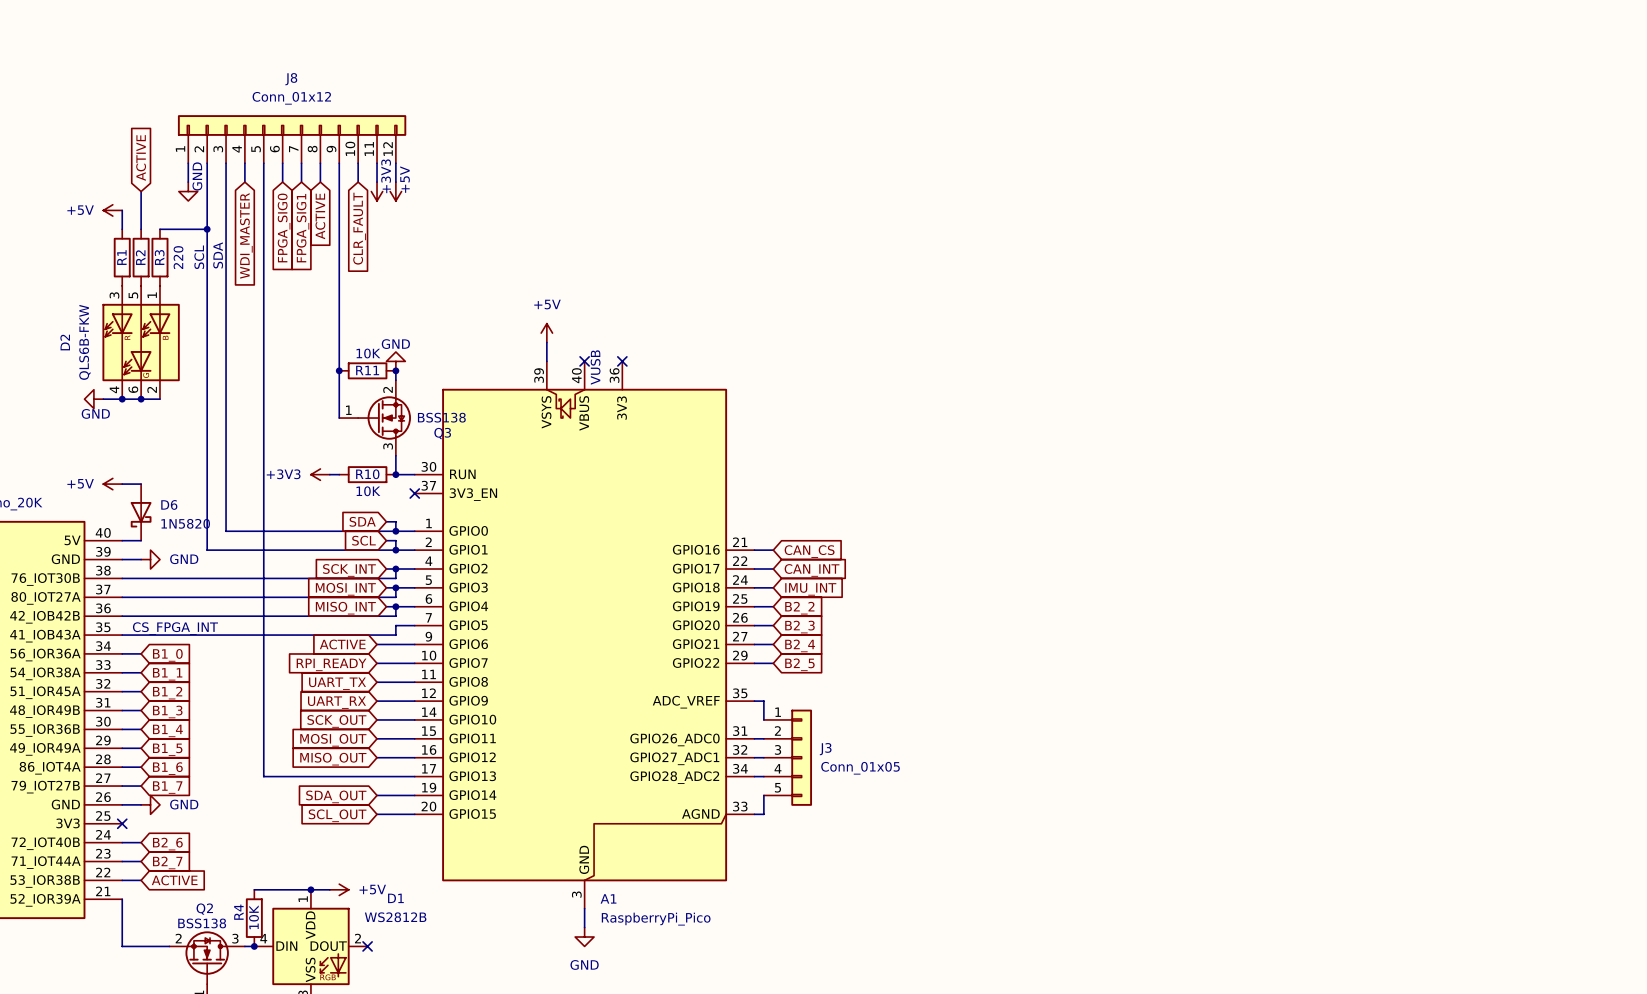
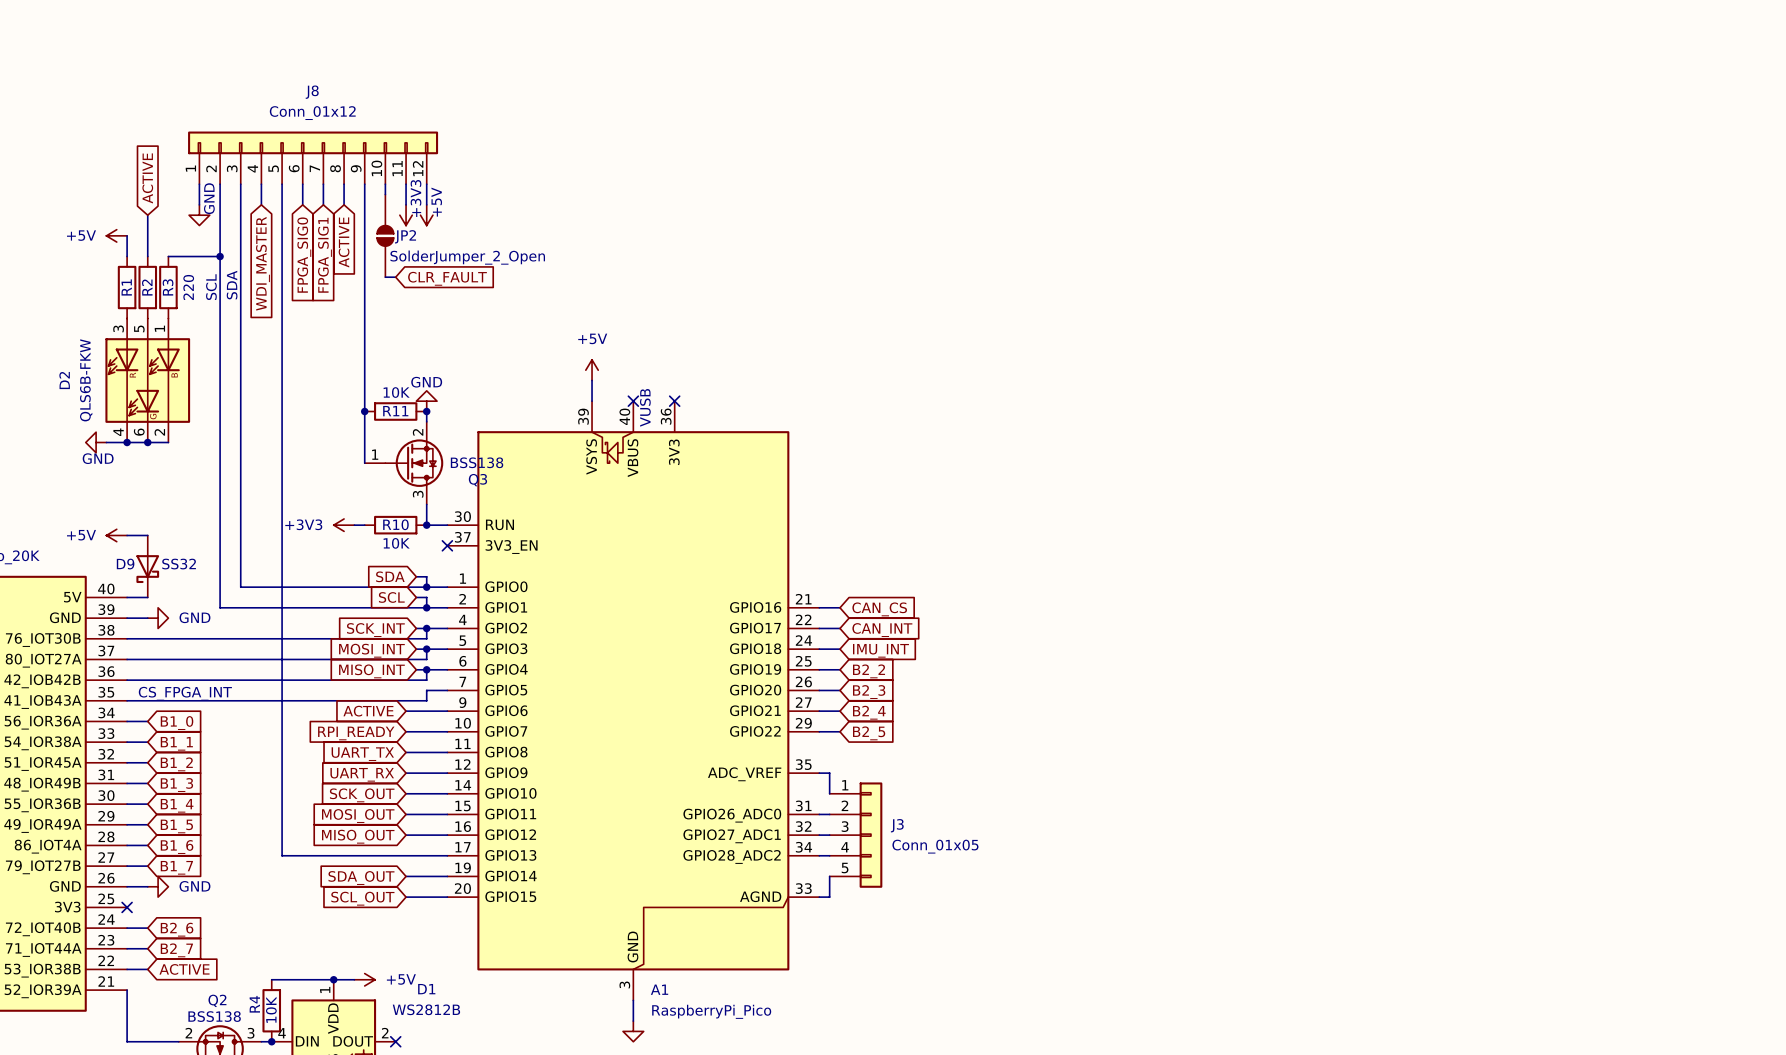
JP2: none -> SolderJumper_2_Open (385, 235)
global label rotation: 0° (359, 228) -> 90° counterclockwise (447, 278)
wire: none -> (385, 277) (395, 277)
D6 name: D6 (169, 504) -> D9 (125, 564)
D6 value: 1N5820 (185, 523) -> SS32 (179, 564)

